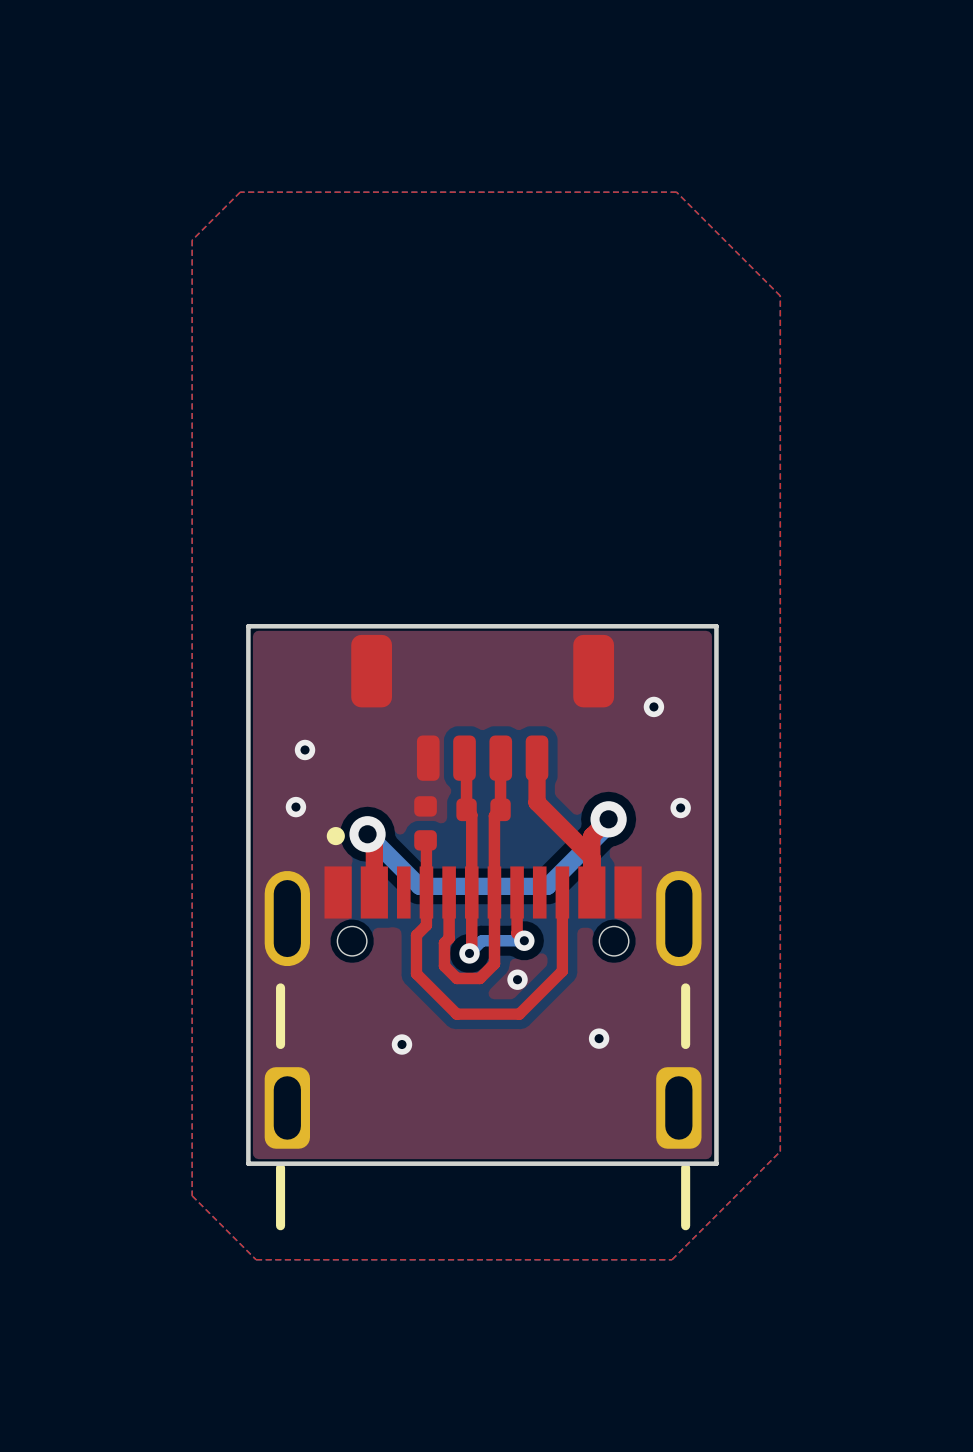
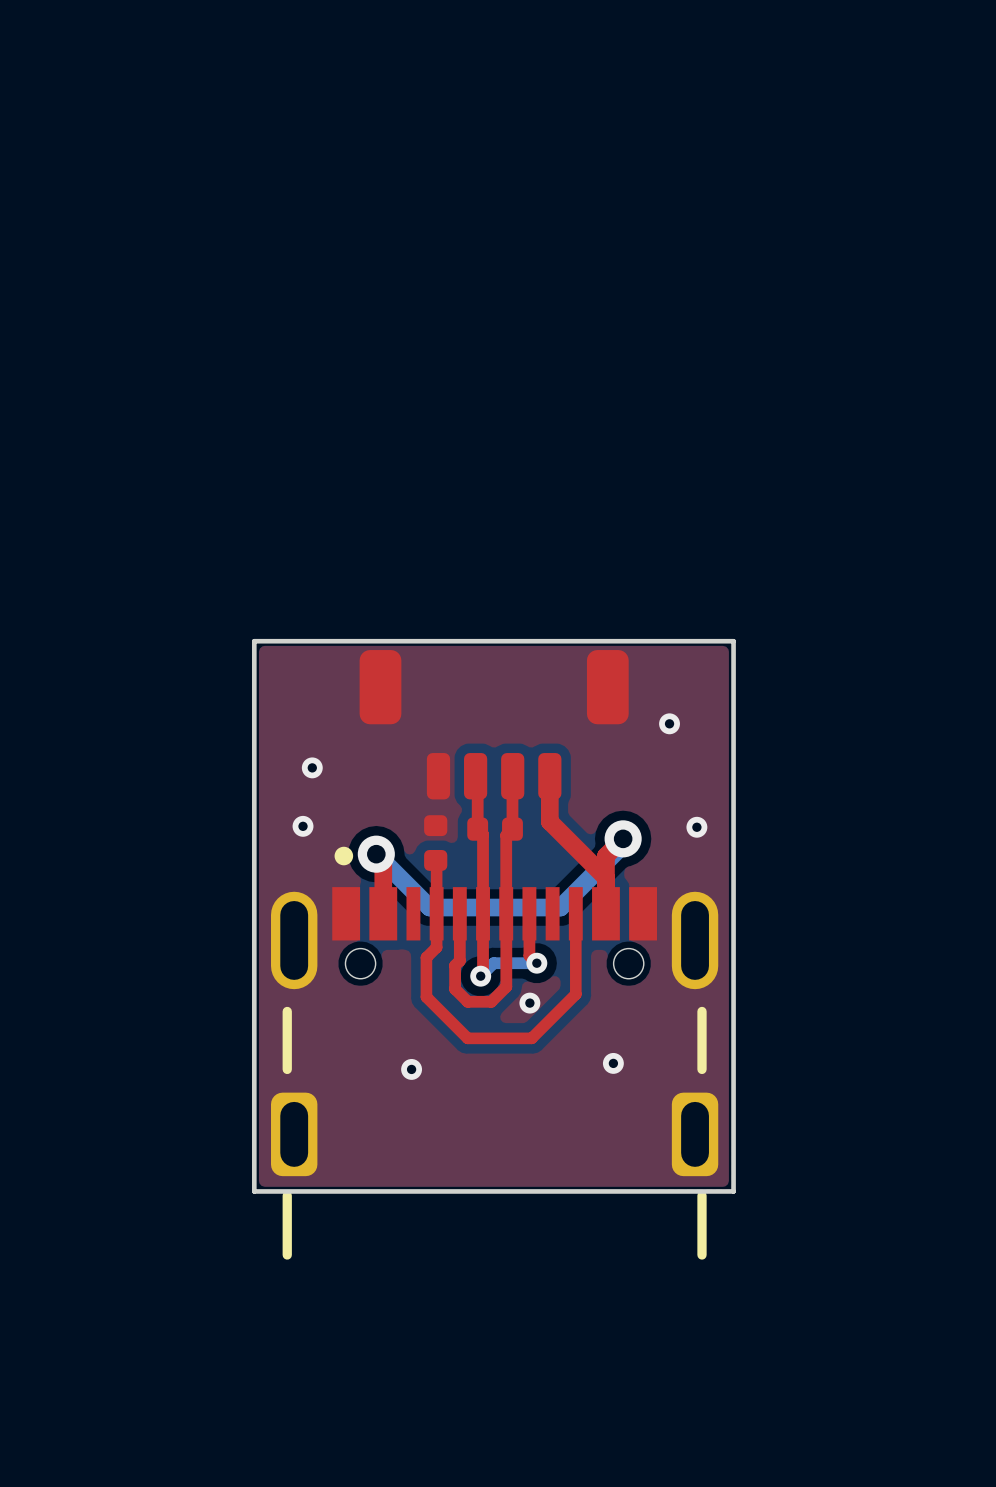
top zone outline: (240, 192) (676, 192) (780, 295) (780, 1151) (672, 1259) (256, 1259) (192, 1195) (192, 240) (240, 192) -> none

